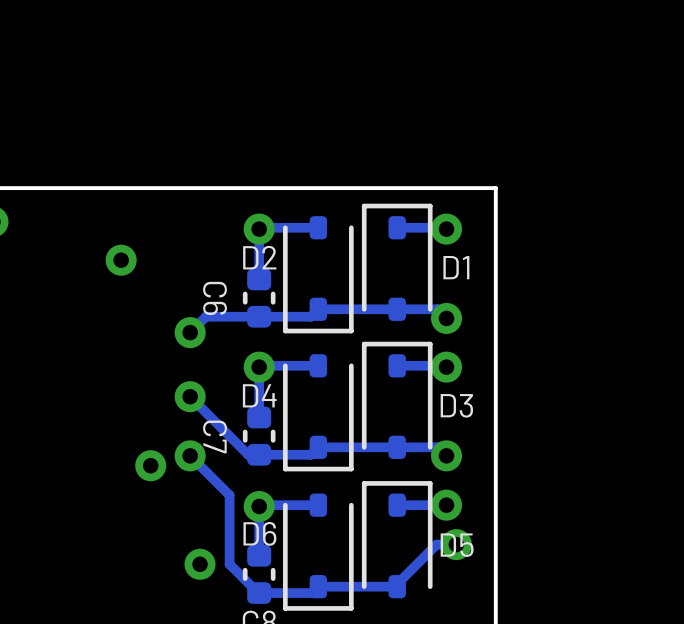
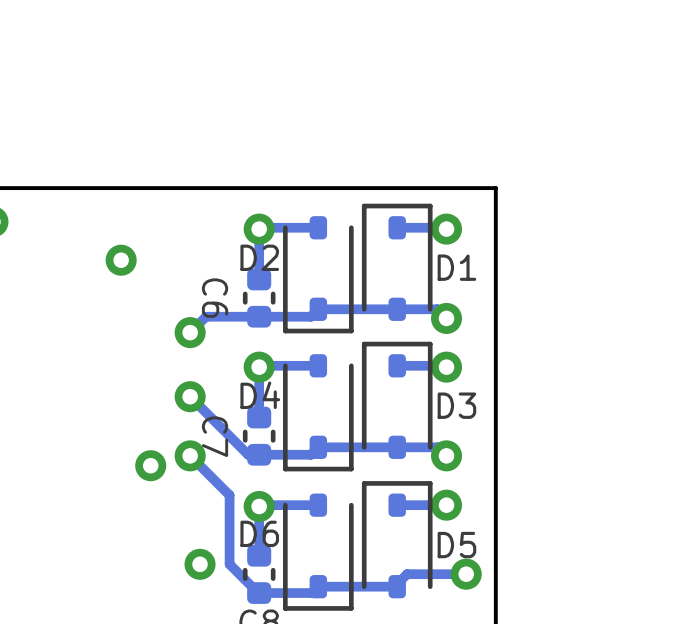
track: (456, 544) (436, 544) (407, 574) -> (466, 574) (407, 574)
via position: (456, 544) -> (466, 574)

